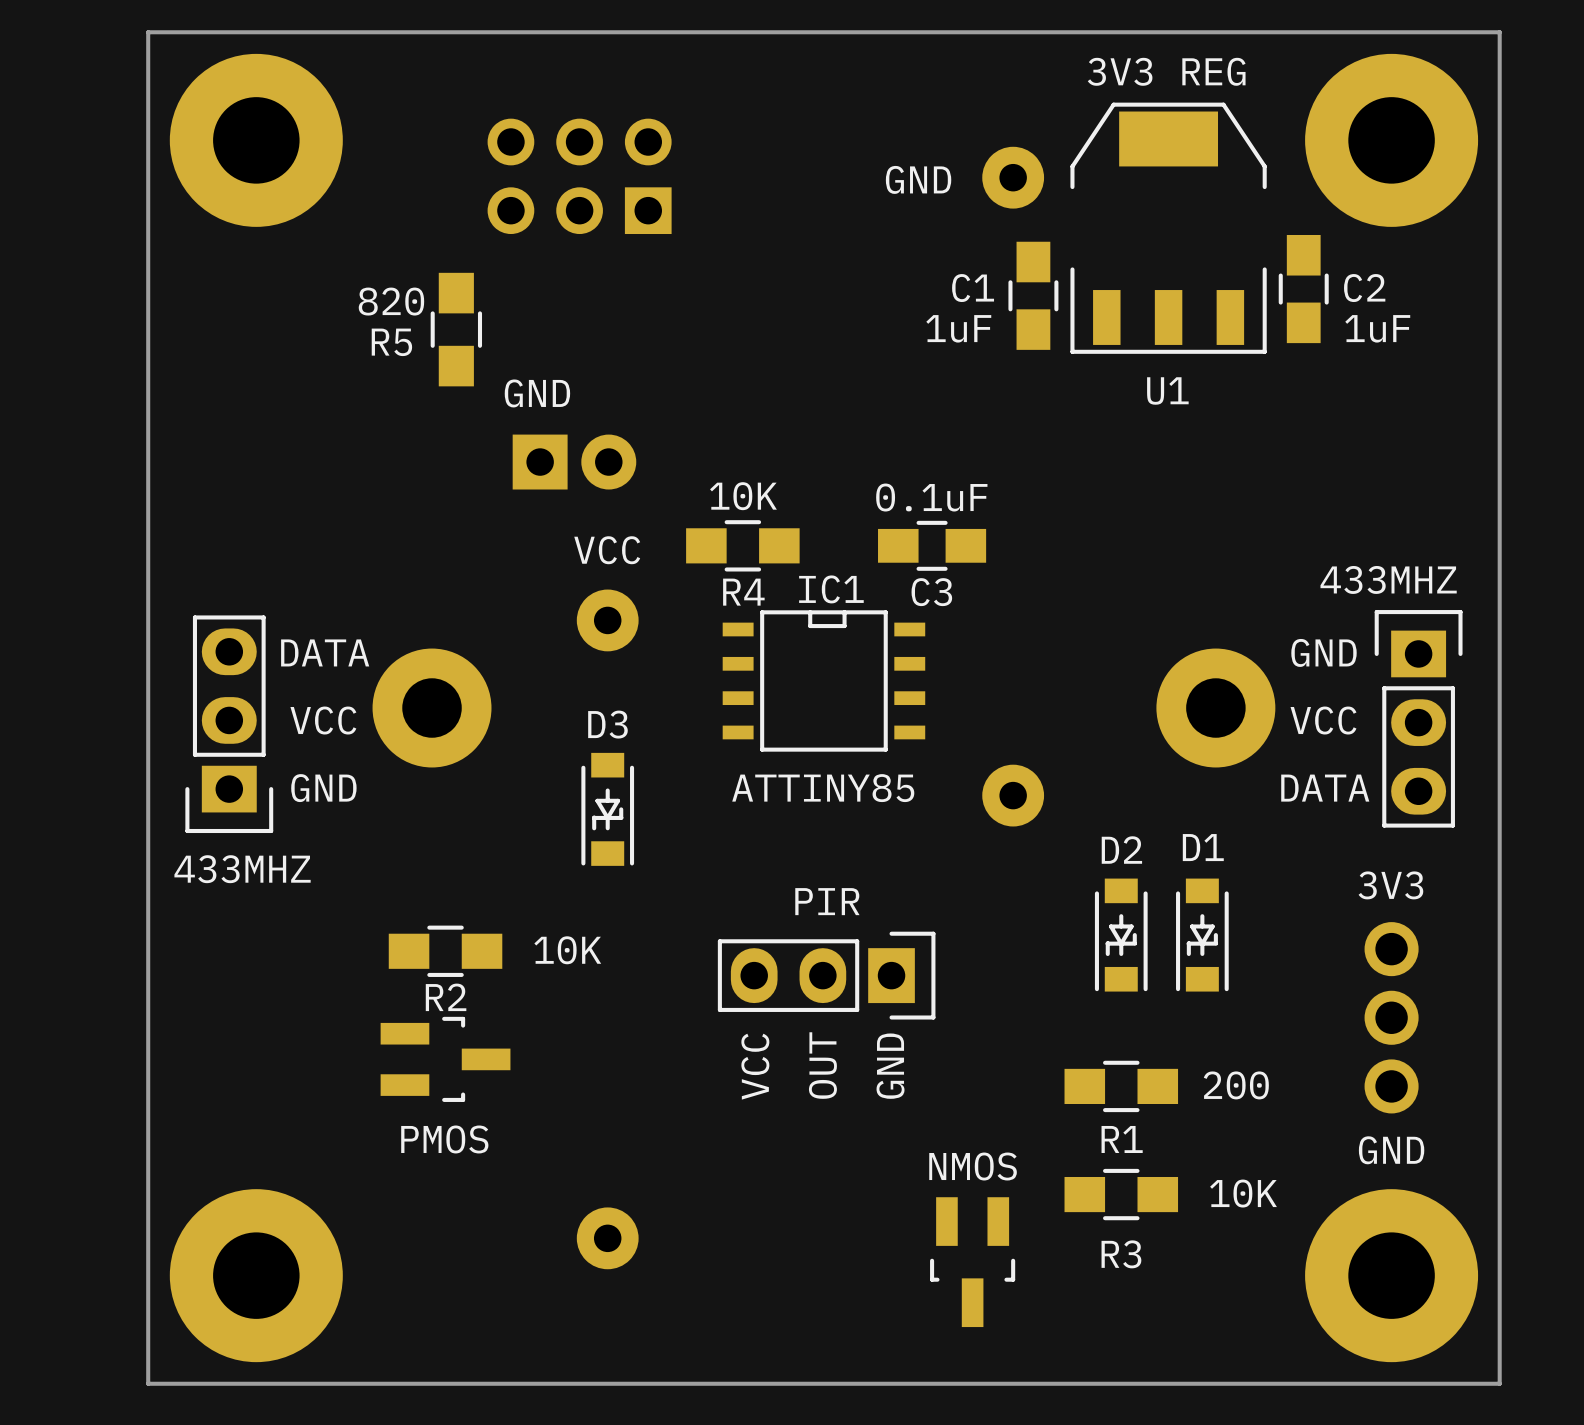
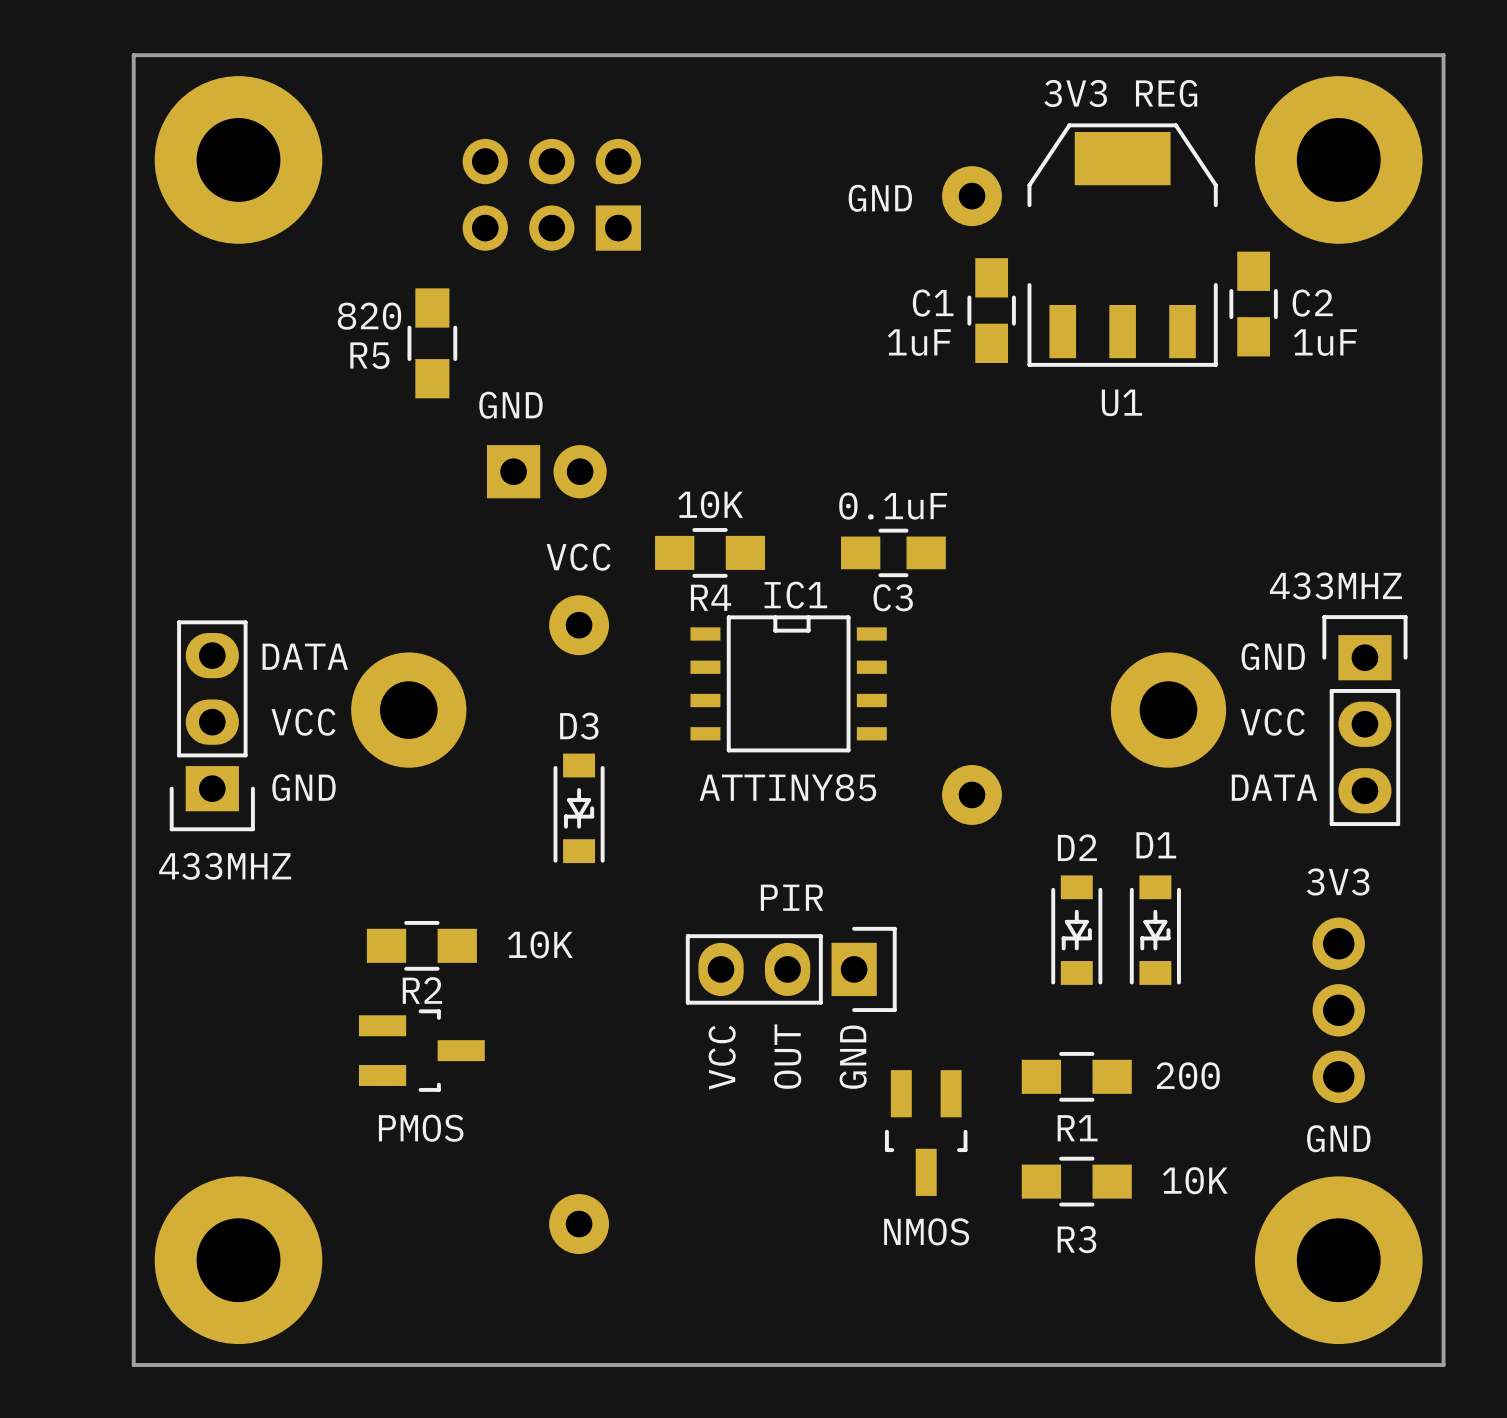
part value position: NMOS (973, 1166) -> NMOS (926, 1231)
part position: (972, 1262) -> (926, 1133)

